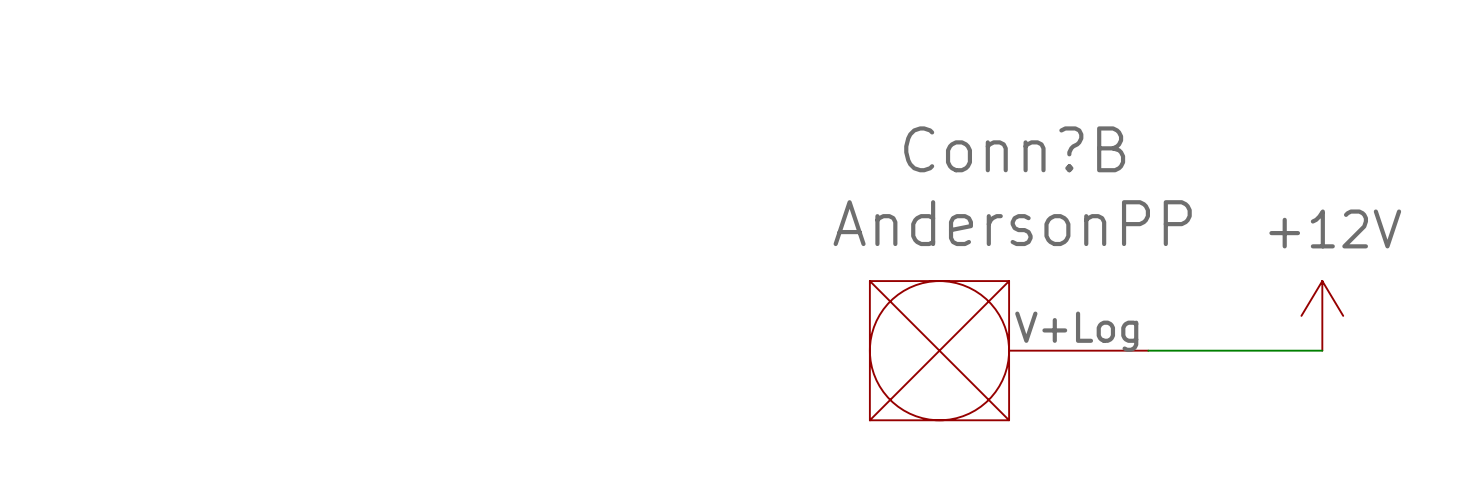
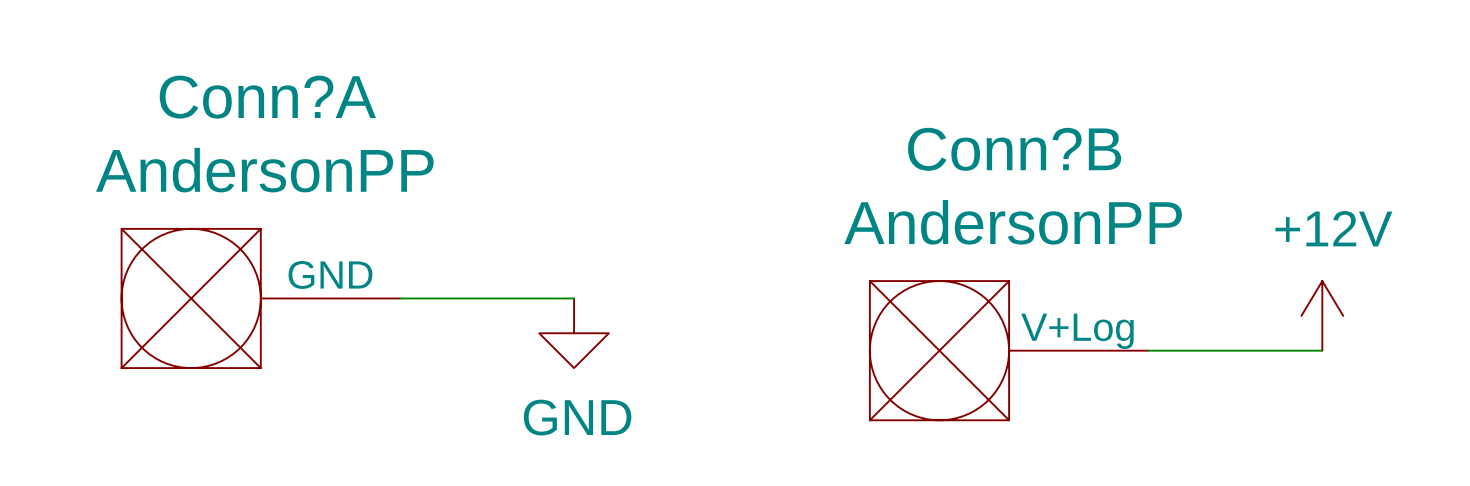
Conn?A: none -> AndersonPP (260, 298)
wire: none -> (400, 298) (574, 298)
power symbol: none -> GND (574, 333)

